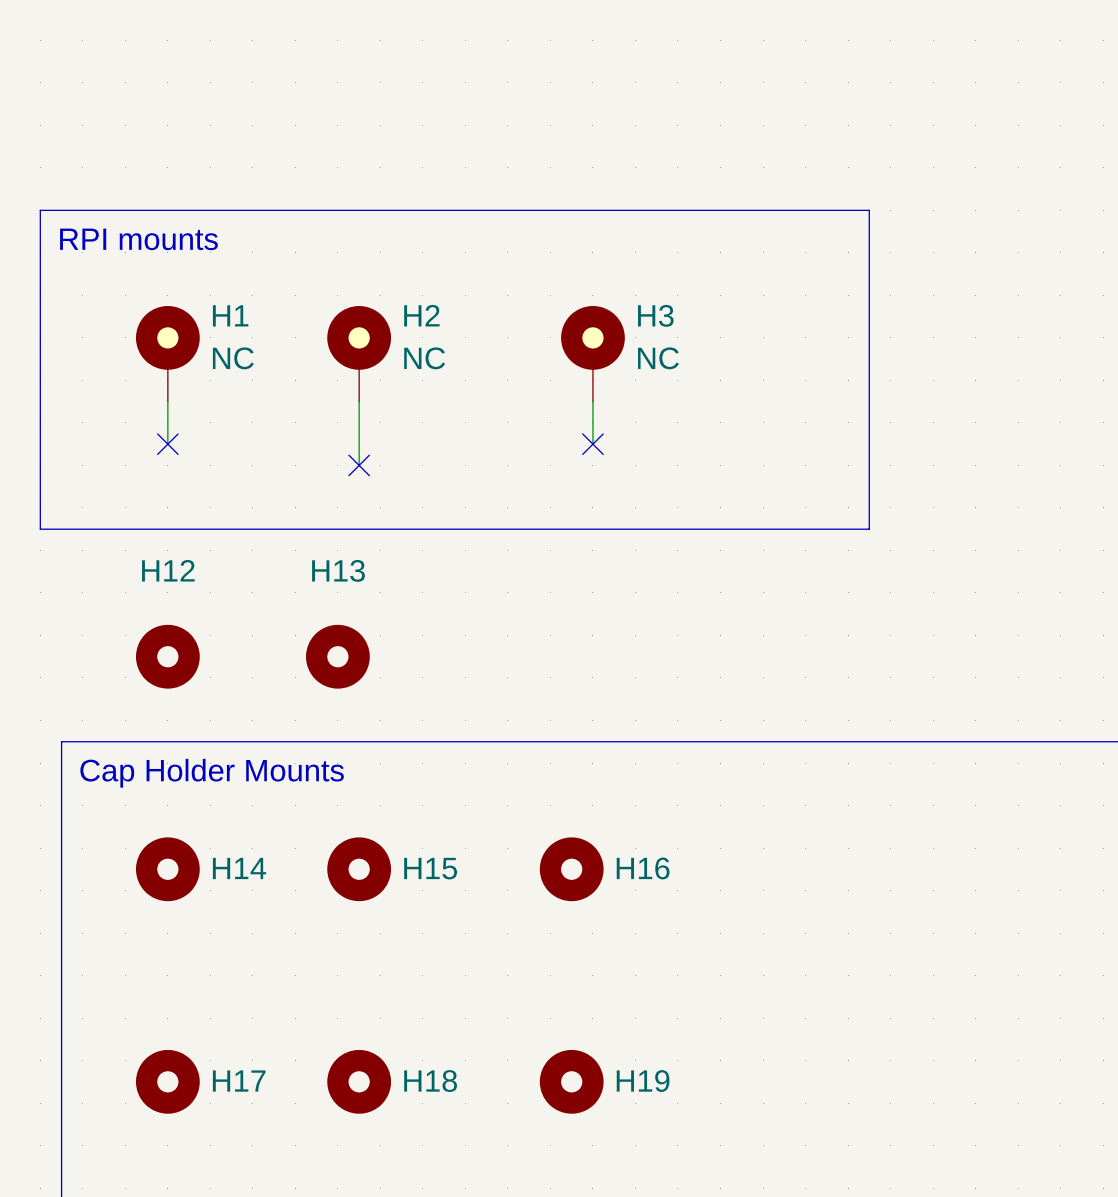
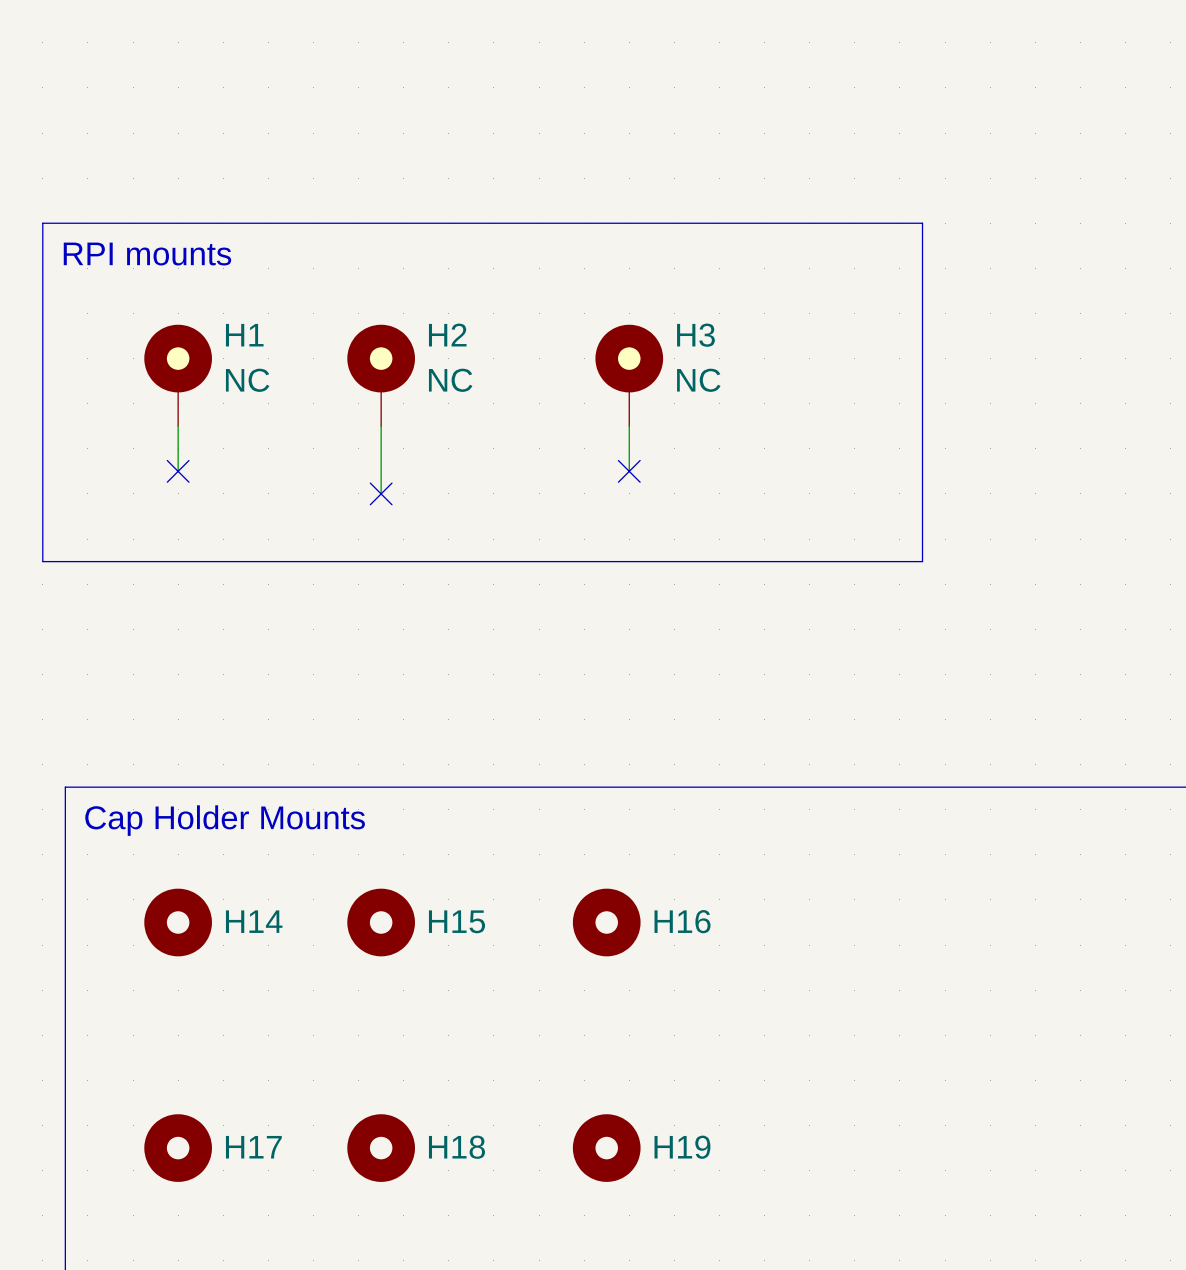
H12: (167, 656) -> none
H13: (337, 656) -> none

